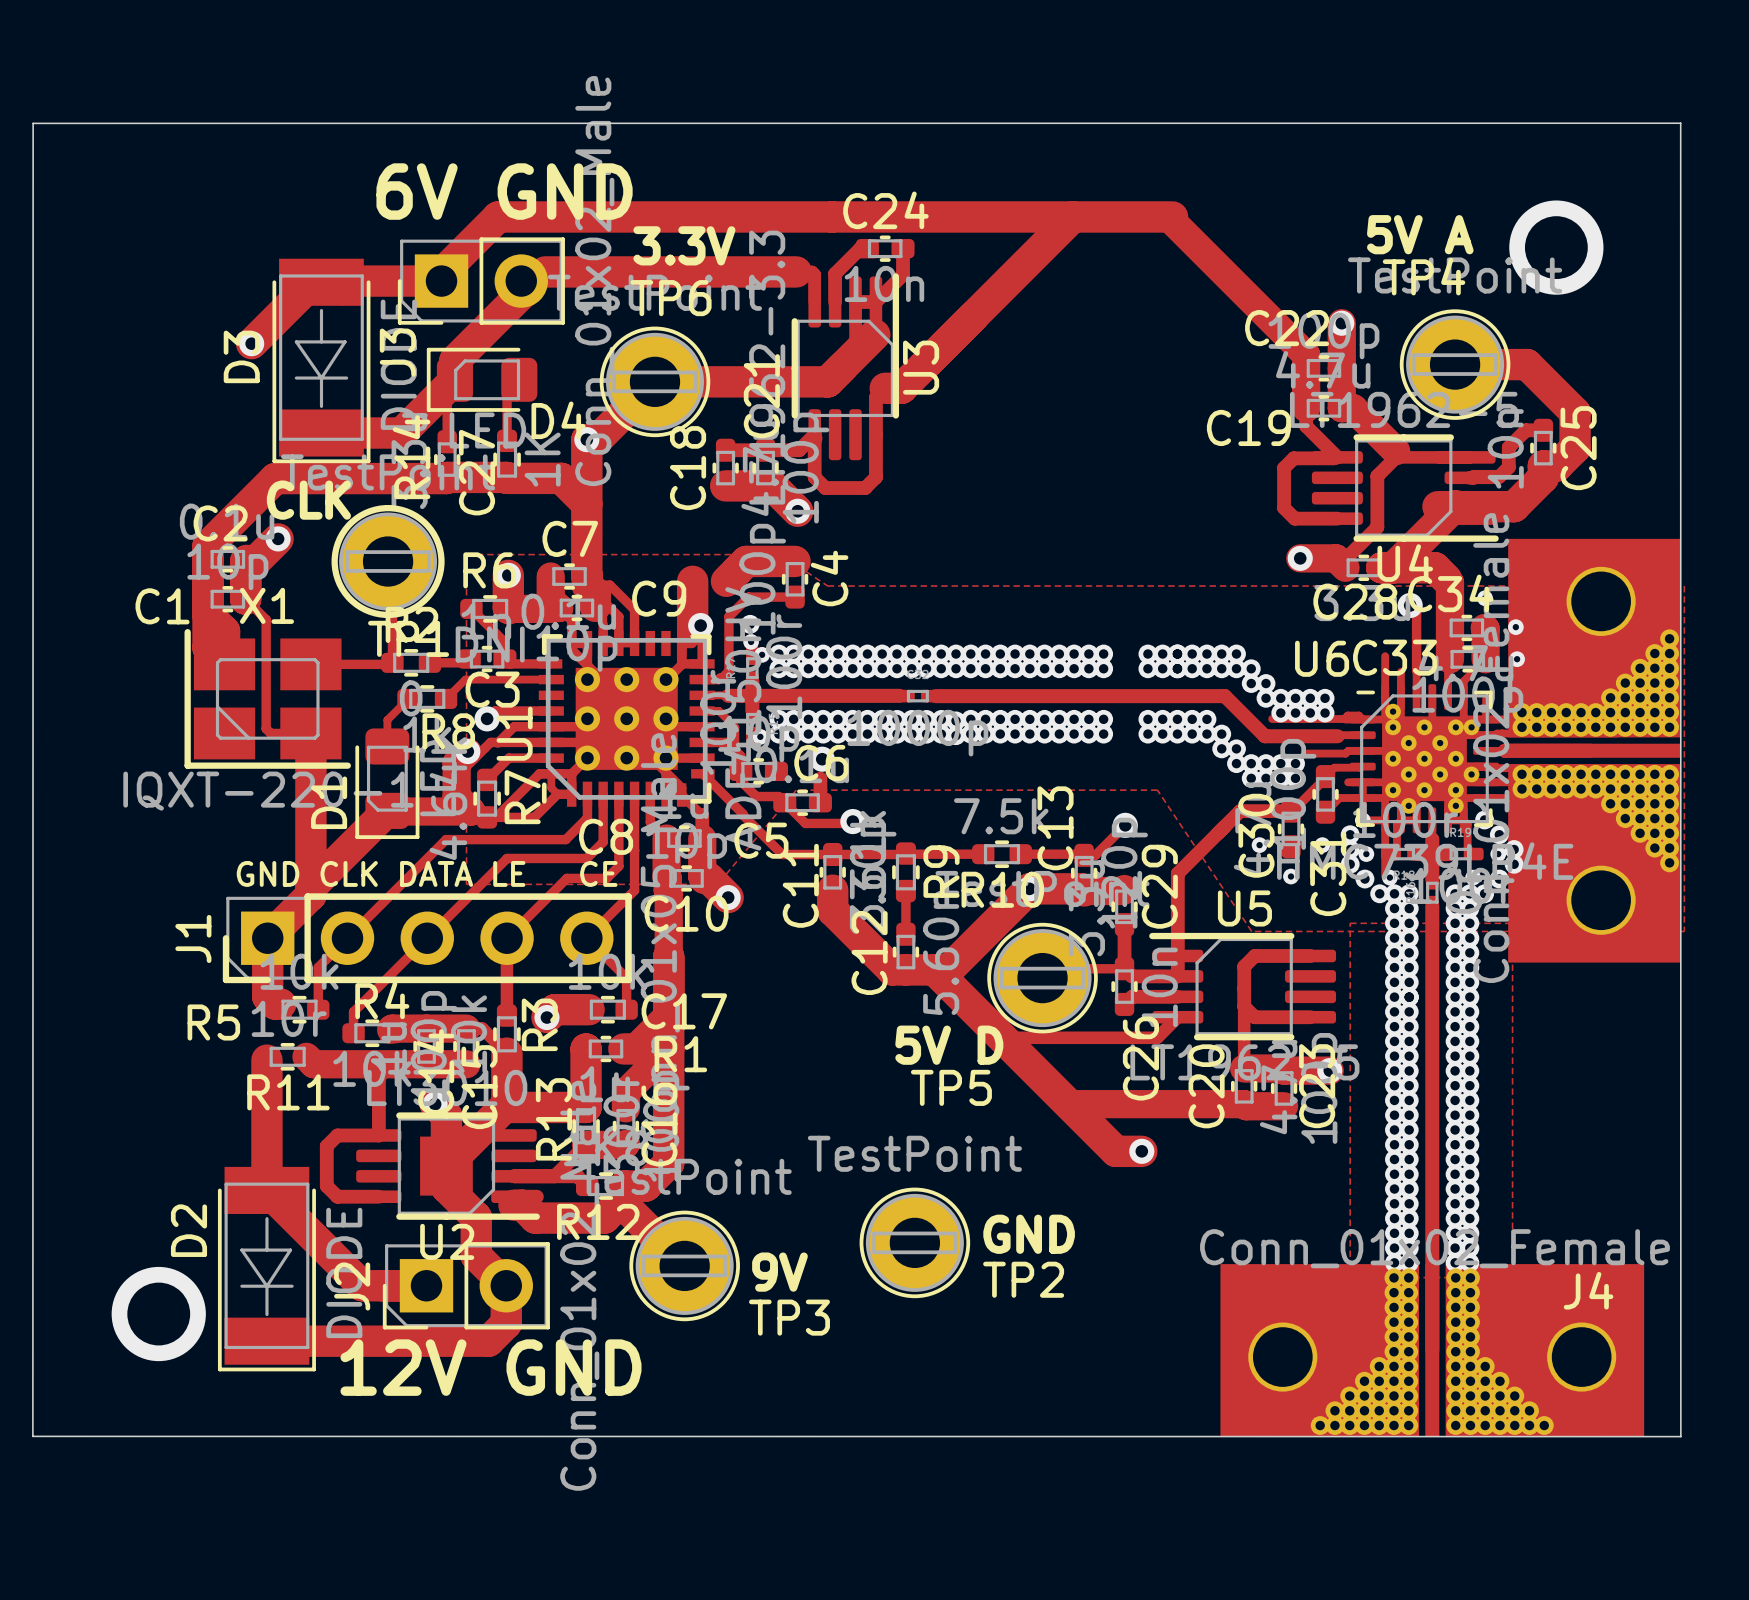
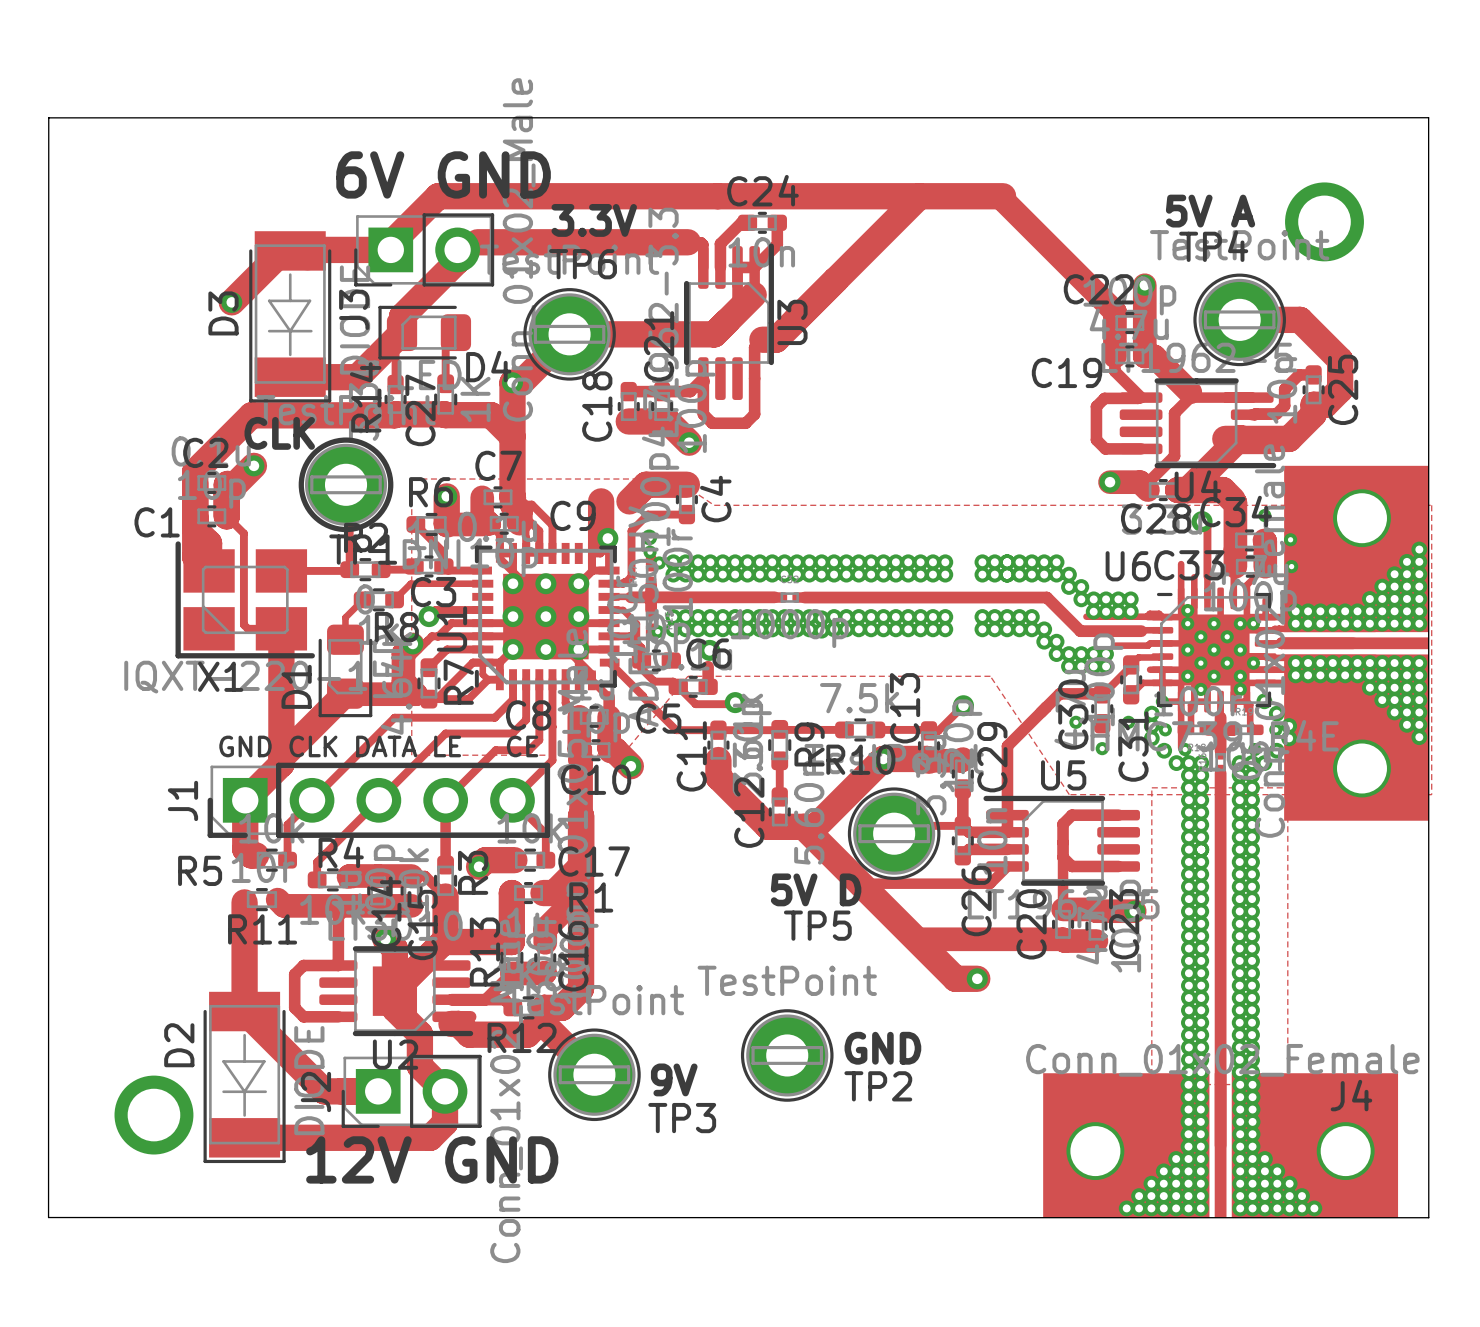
X1 name position: X1 (266, 605) -> X1 (220, 676)

